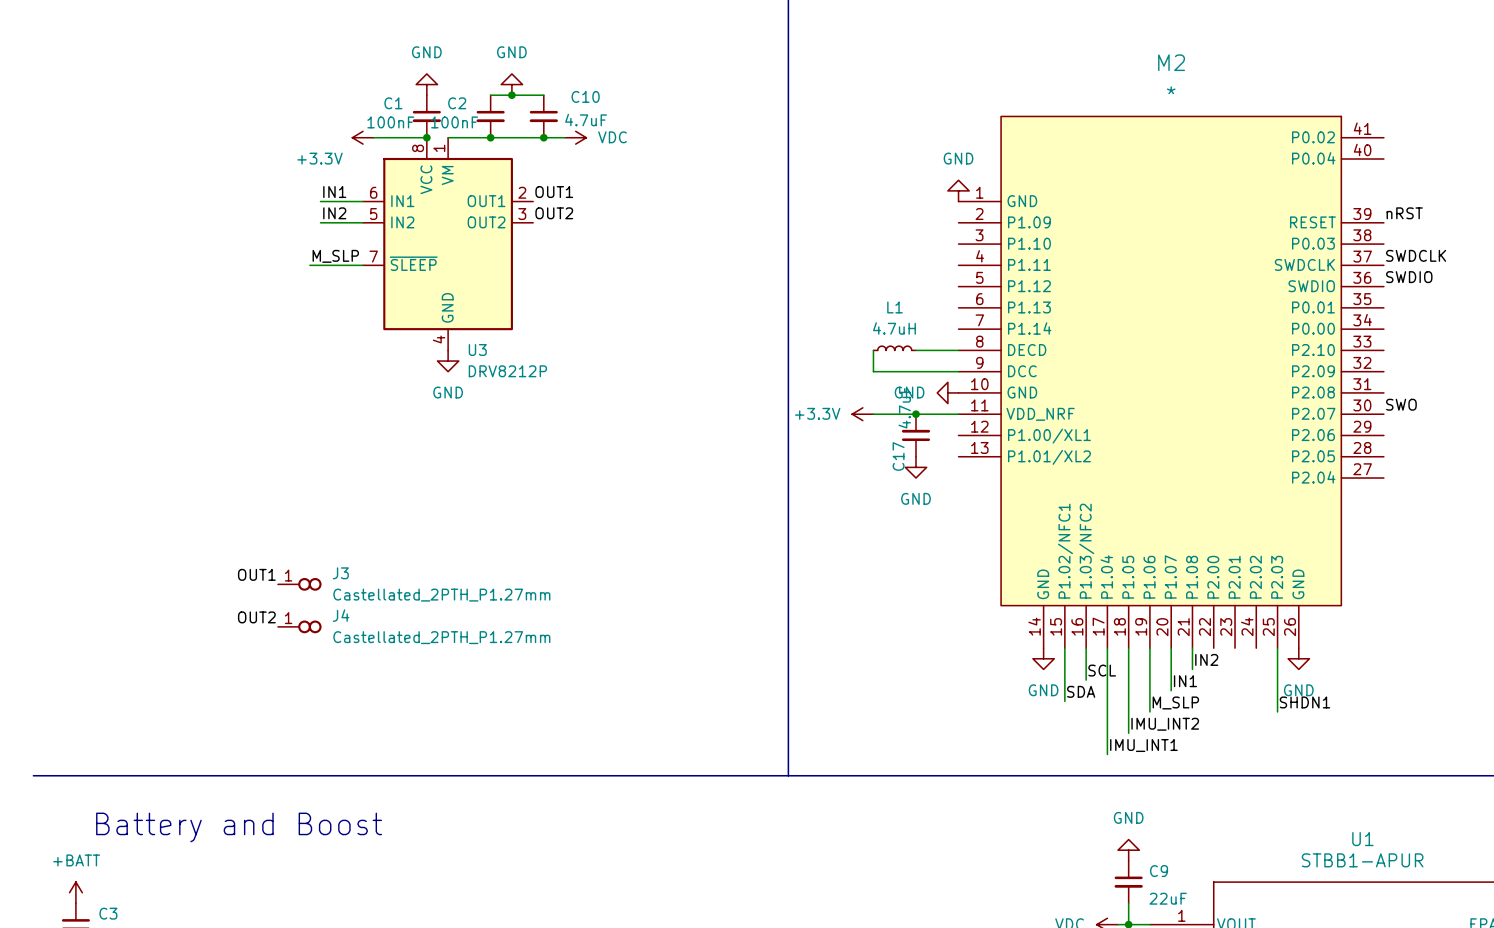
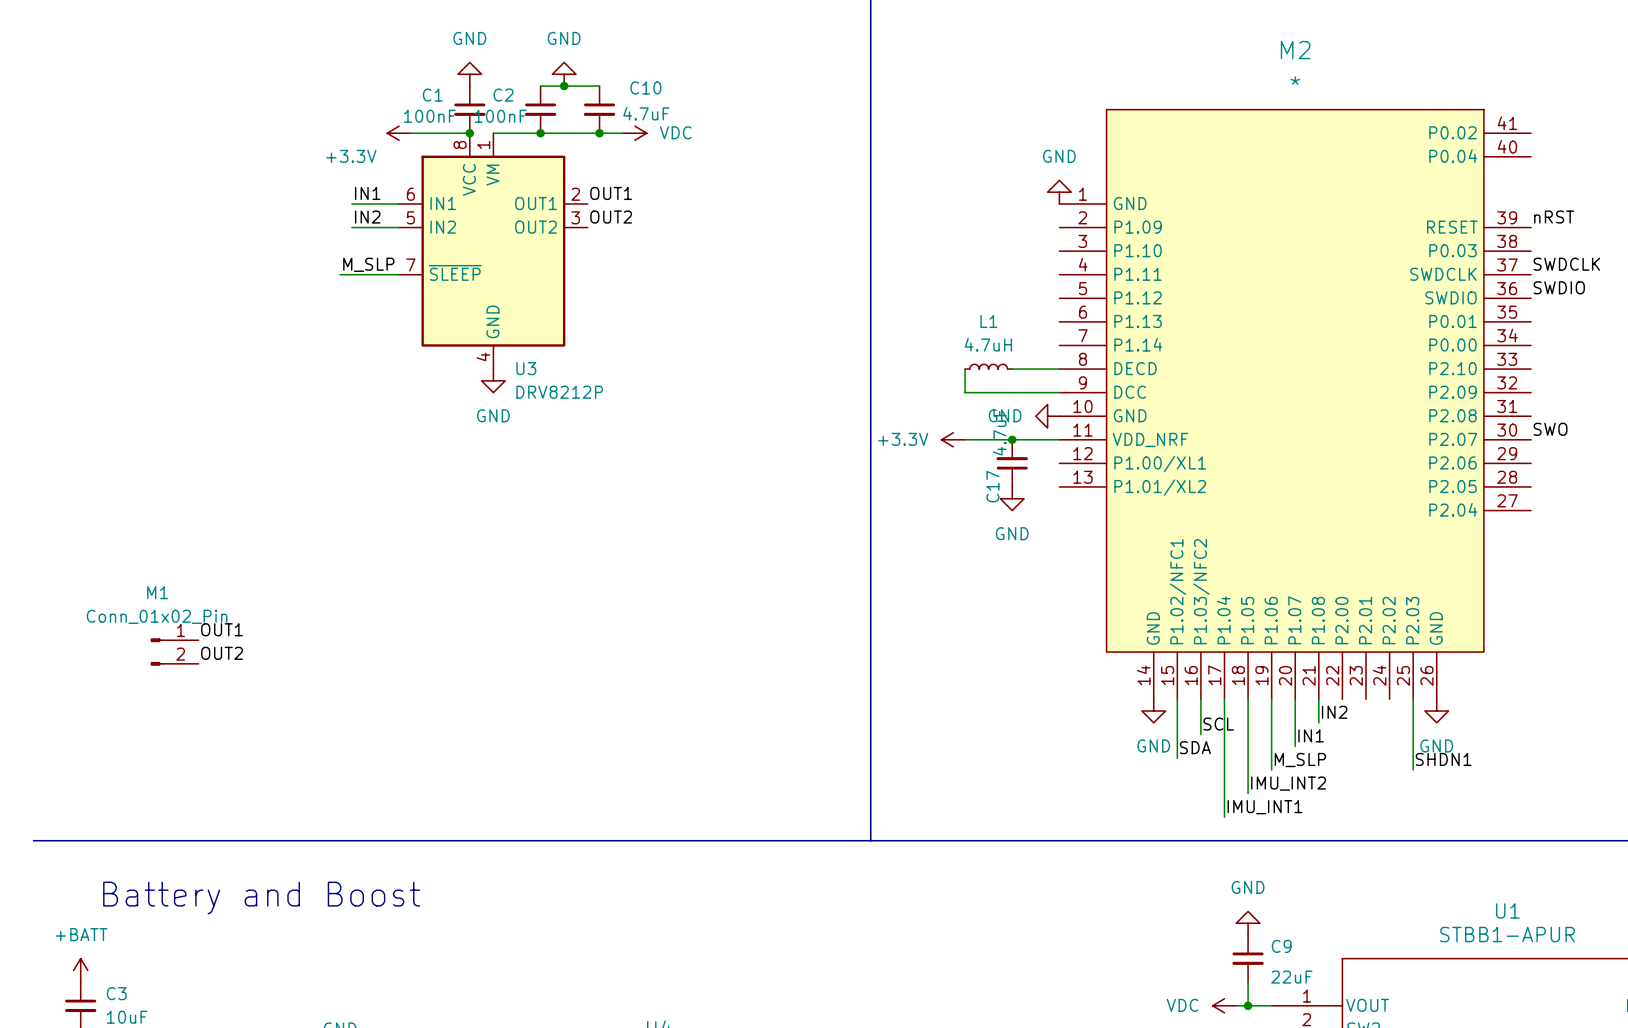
label position: OUT1 (256, 574) -> OUT1 (222, 629)
J3: Castellated_2PTH_P1.27mm (299, 584) -> none
M1: none -> Conn_01x02_Pin (174, 652)
label position: OUT2 (256, 617) -> OUT2 (222, 653)
J4: Castellated_2PTH_P1.27mm (299, 626) -> none

